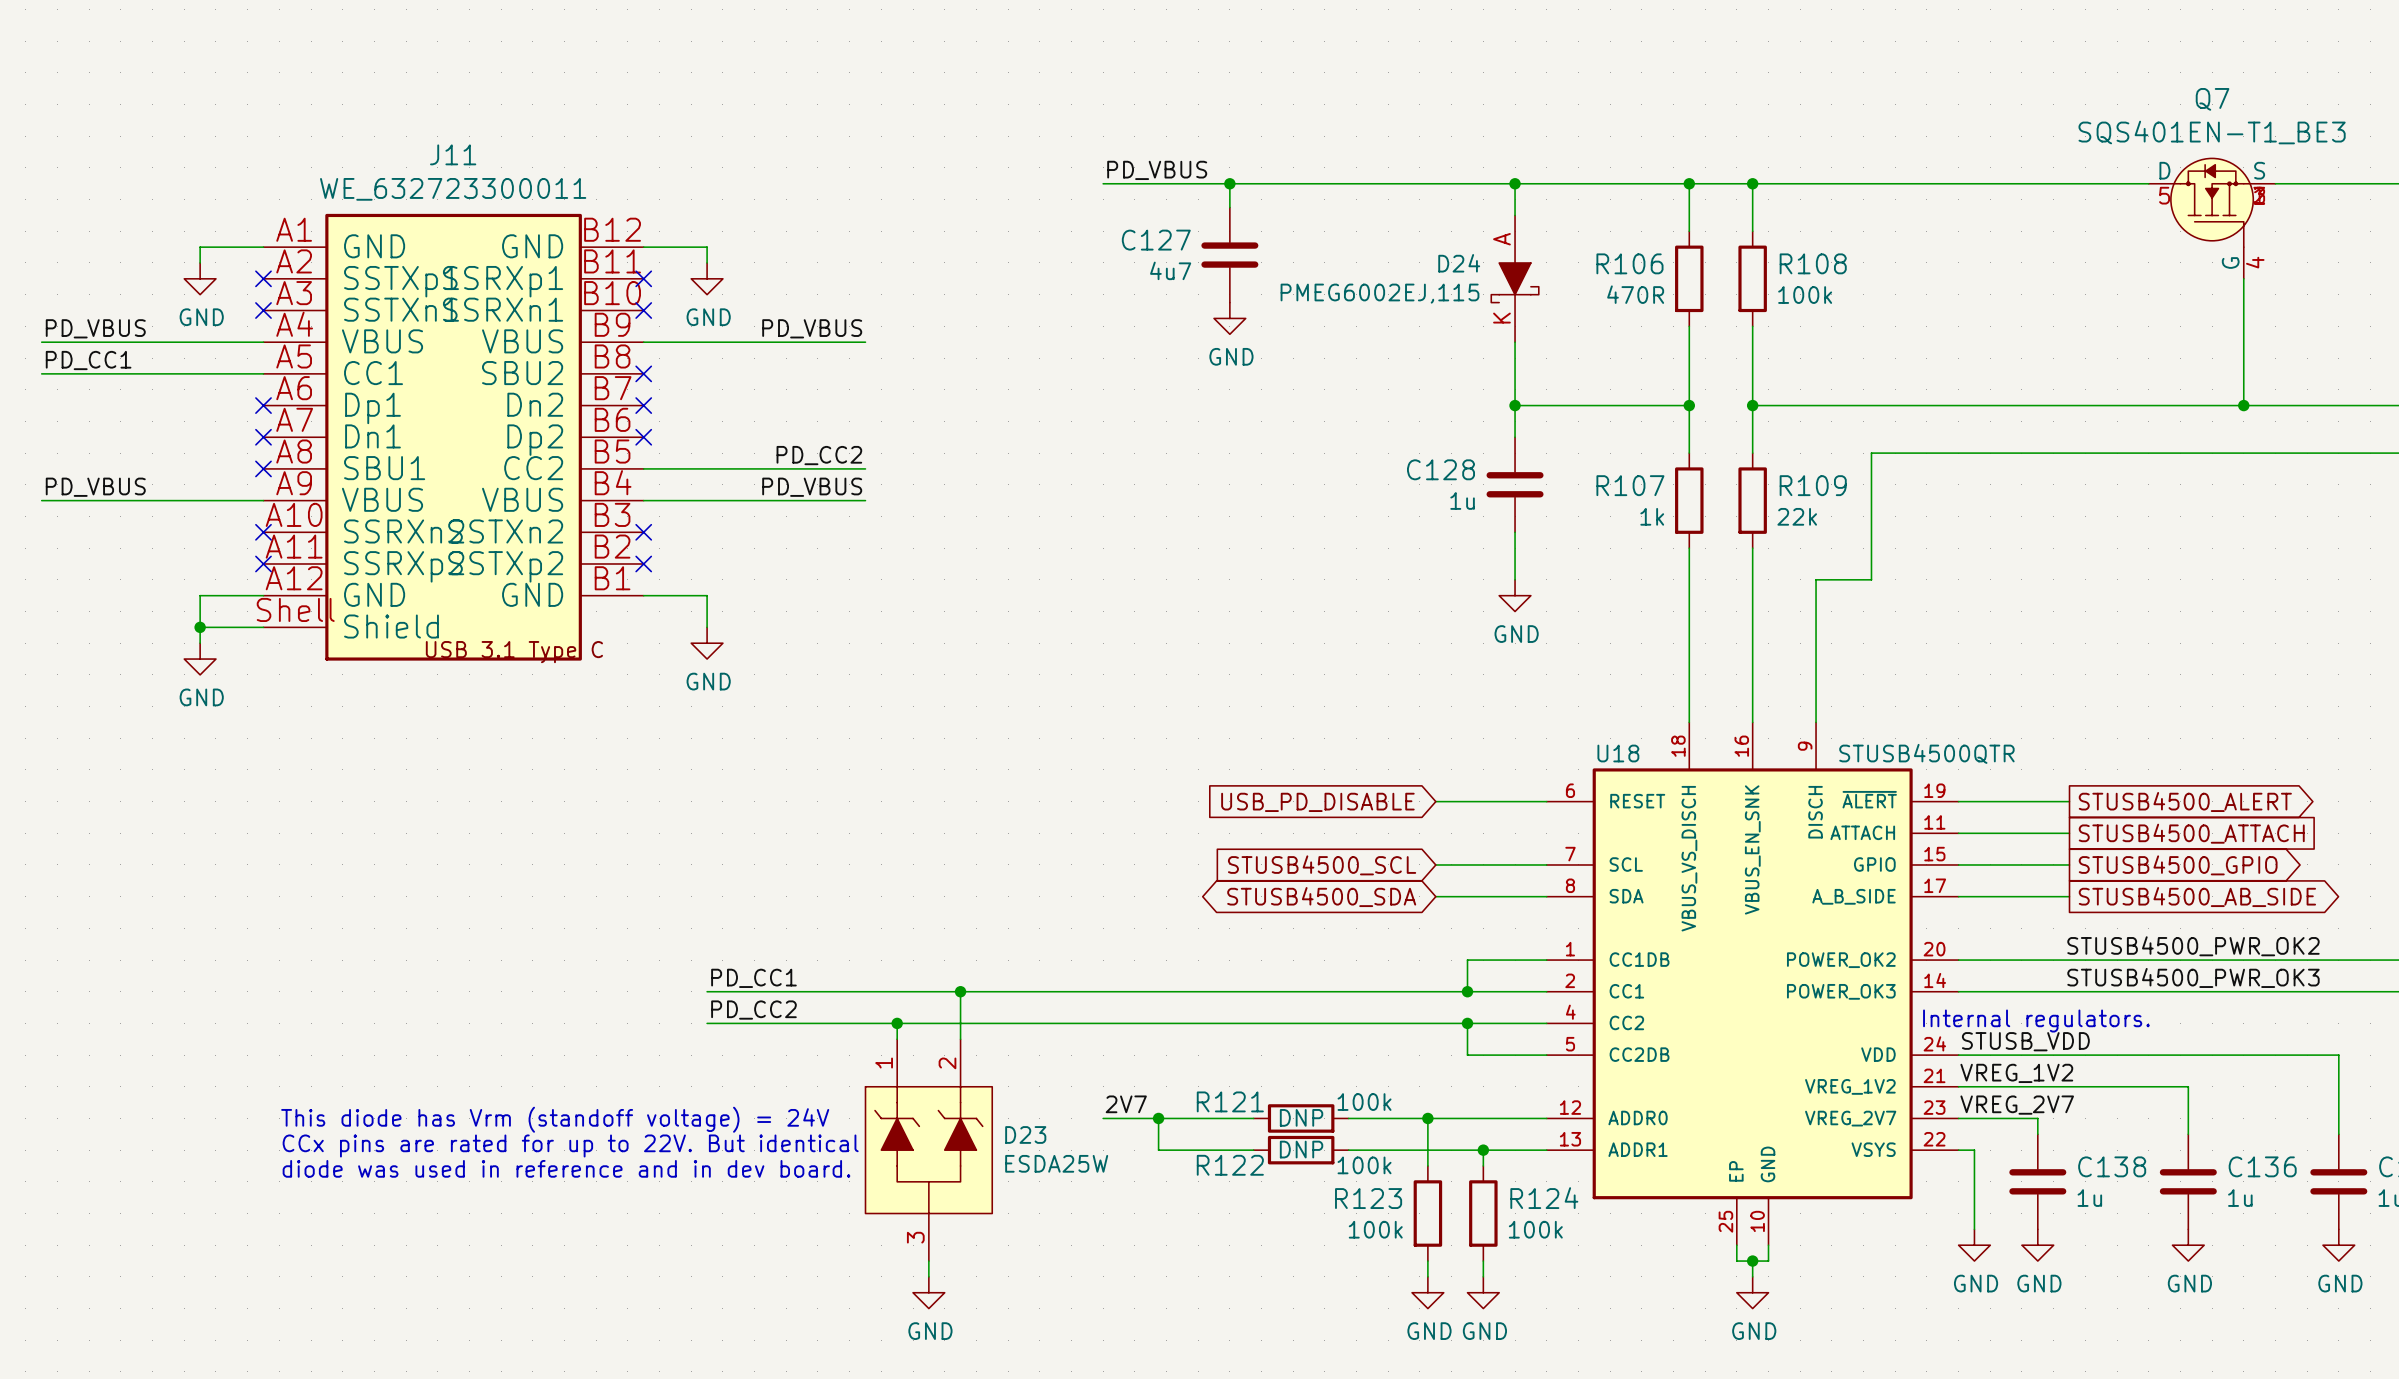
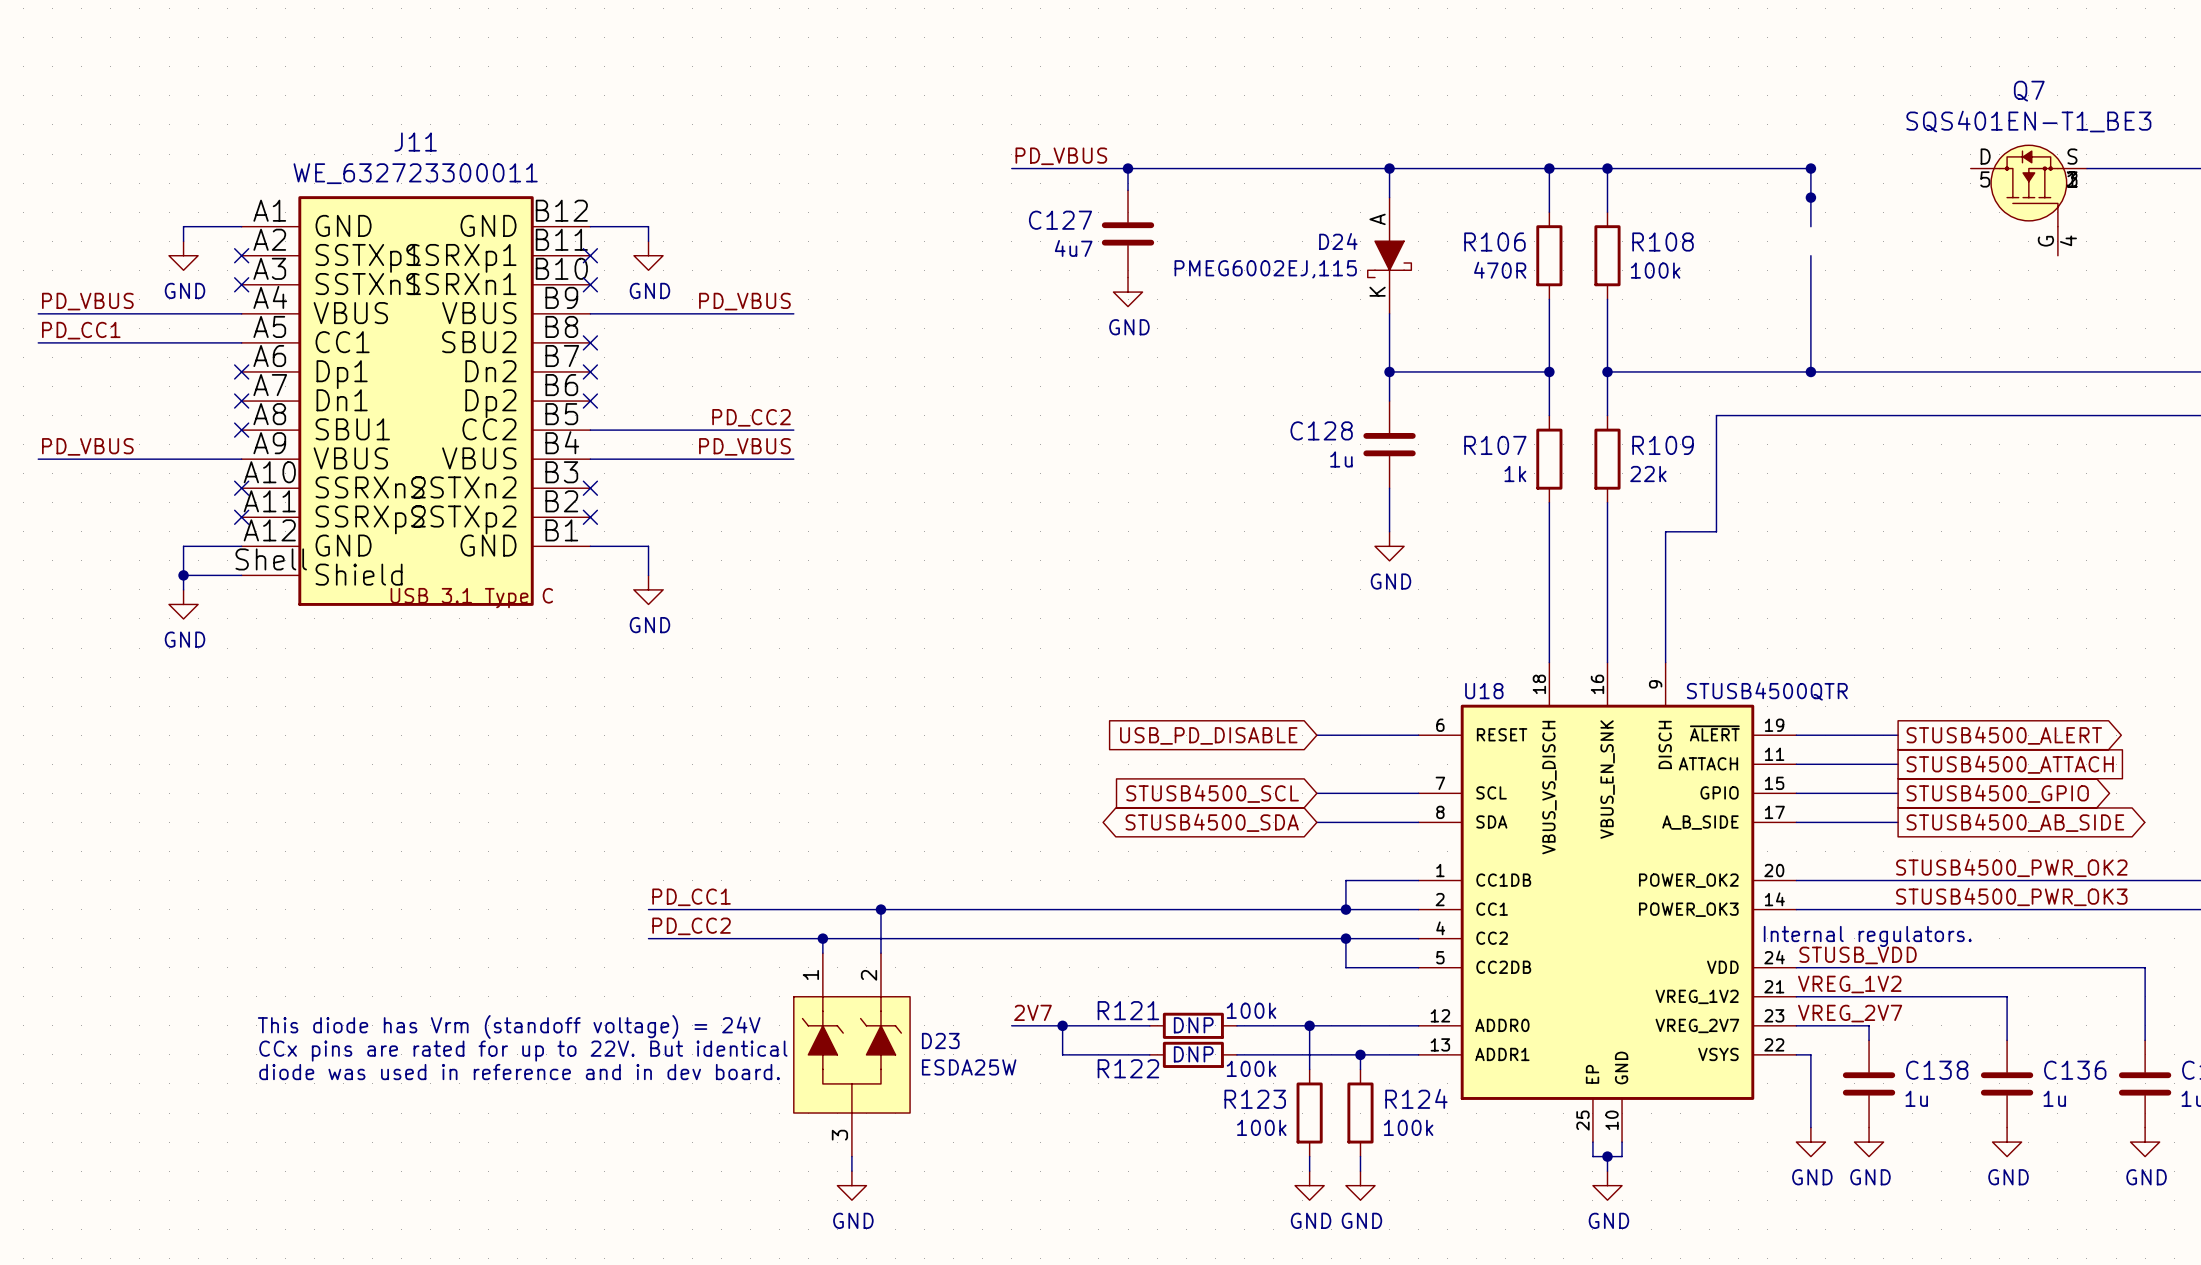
wire: (1974, 183) (2148, 183) -> (1810, 168) (1810, 226)
junction: none -> (1810, 168)
junction: none -> (1810, 197)
wire: (2243, 278) (2243, 405) -> (1810, 255) (1810, 371)
junction: none -> (1810, 371)
junction: (2243, 405) -> none

